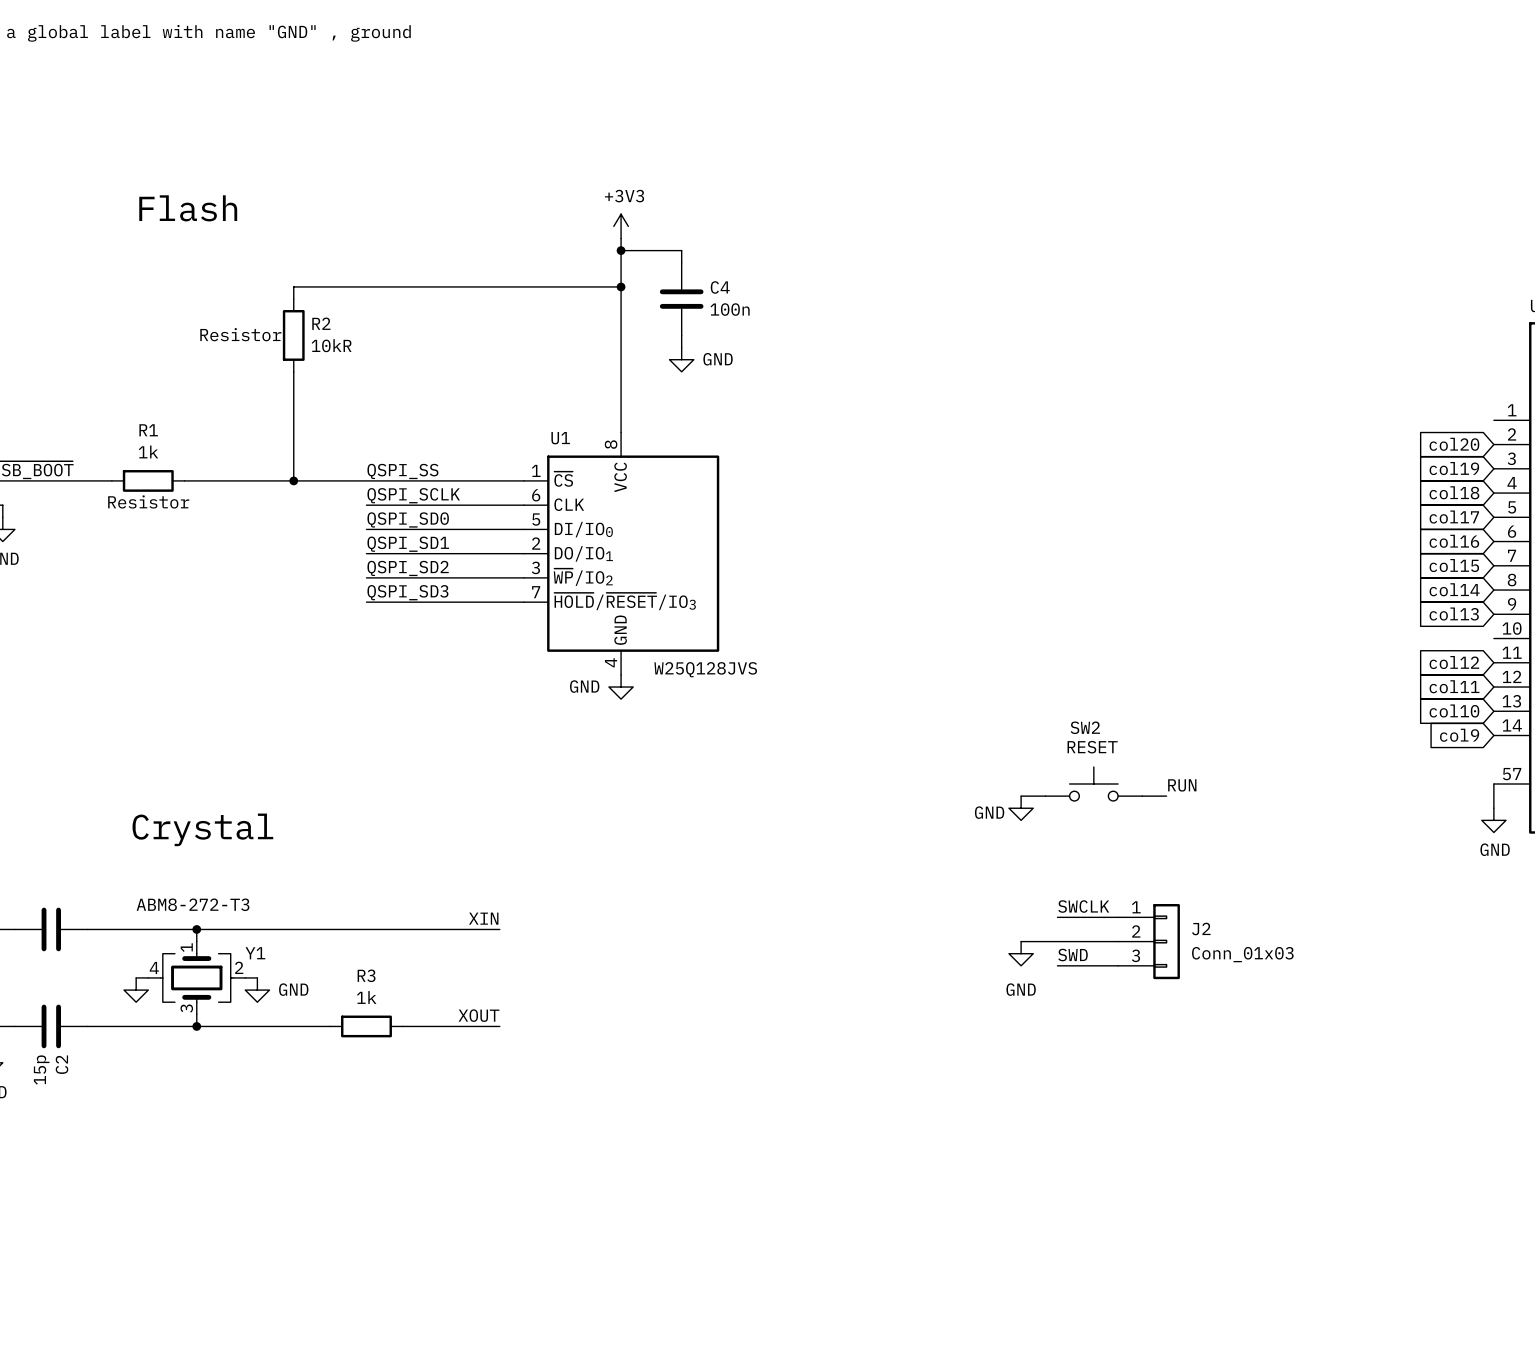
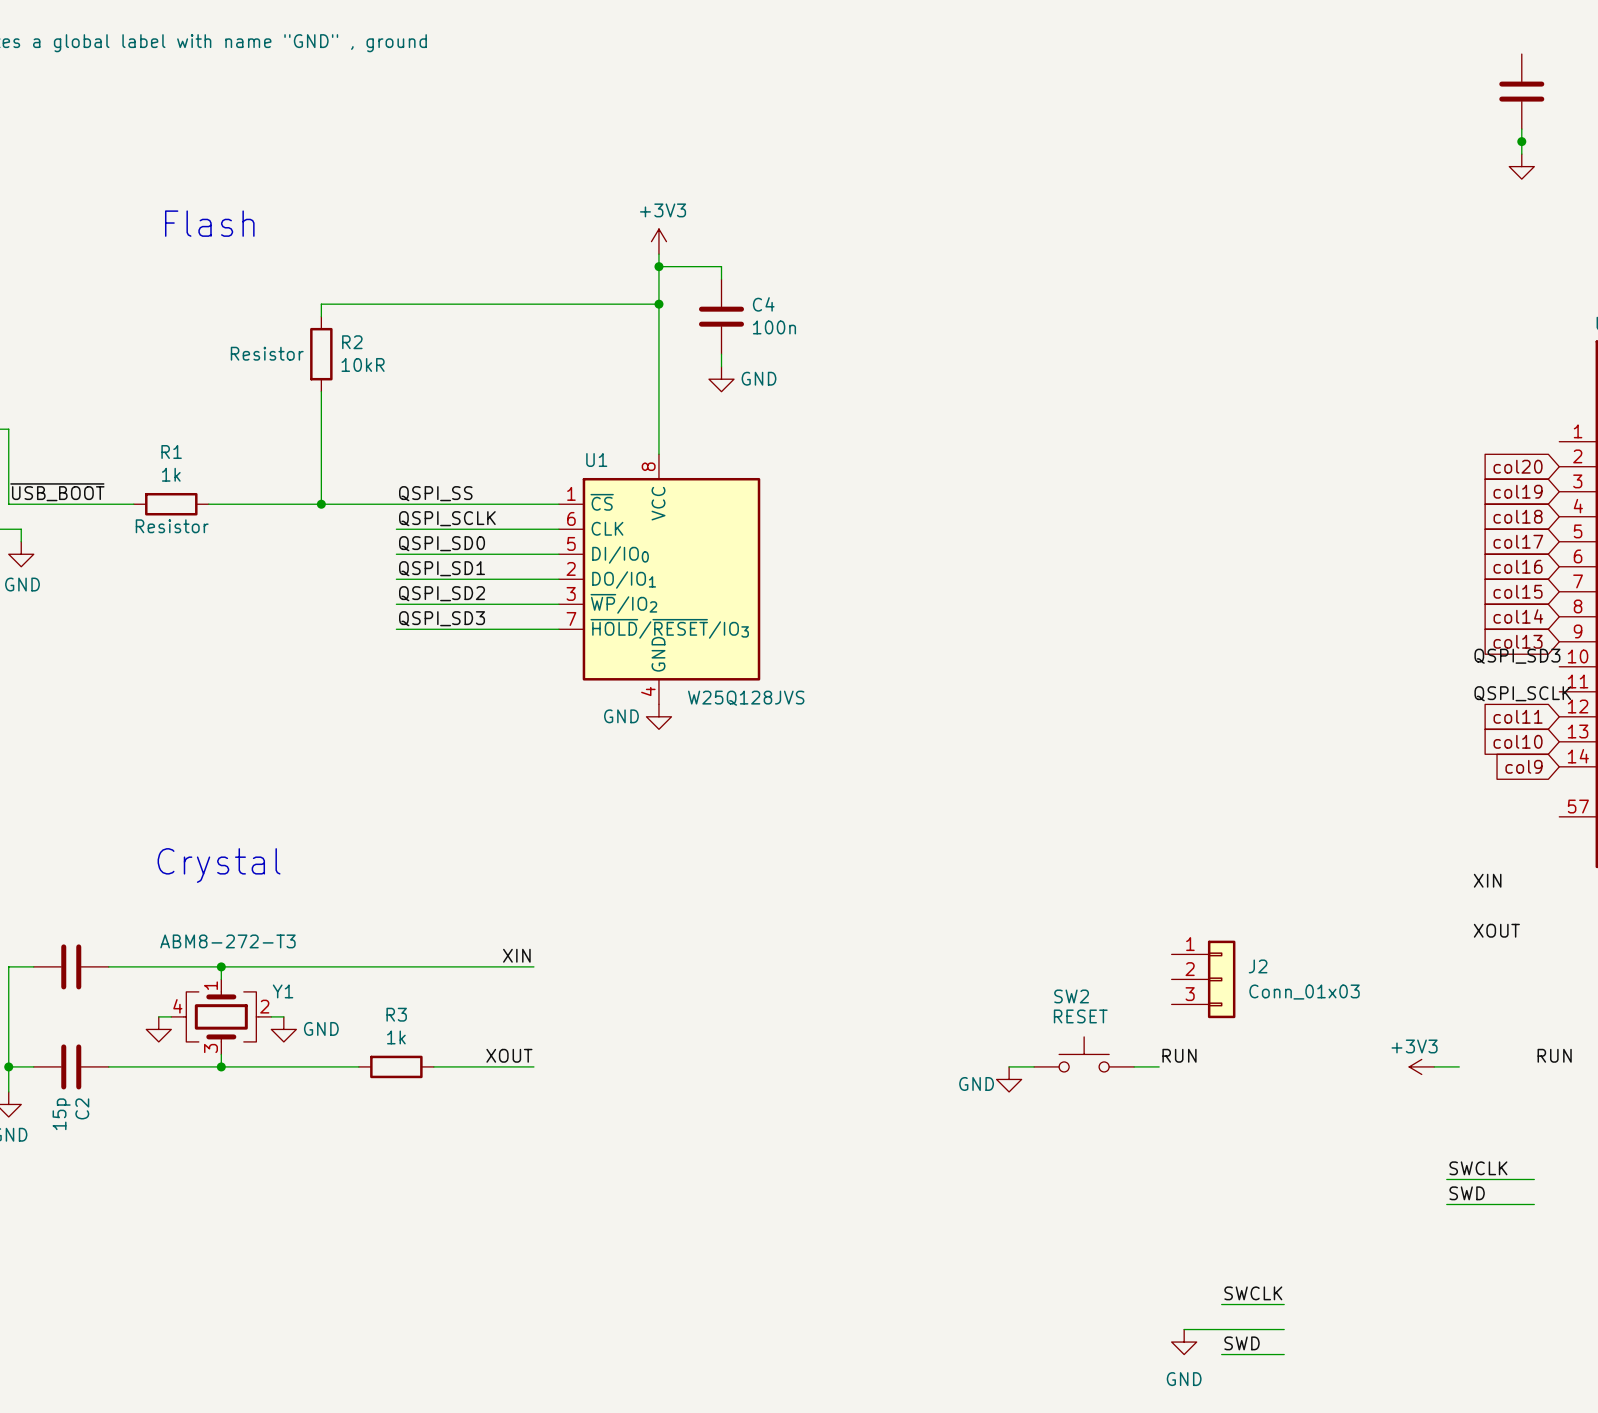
part: none -> (1521, 91)
wire: none -> (1521, 129) (1521, 154)
junction: none -> (1521, 141)
power symbol: none -> (1521, 166)
label: none -> QSPI_SD3 (1517, 656)
global label: col12 (1454, 662) -> none
label: none -> QSPI_SCLK (1522, 693)
SW2 position: (1093, 783) -> (1084, 1054)
wire: (1493, 783) (1493, 808) -> none
label: RUN (1182, 785) -> none
wire: (1021, 796) (1045, 796) -> (1009, 1066) (1034, 1066)
wire: (1142, 796) (1166, 796) -> (1134, 1066) (1159, 1066)
power symbol: GND (1021, 808) -> none
power symbol: GND (1493, 820) -> none
label: none -> XIN (1487, 880)
label: none -> XOUT (1496, 930)
label: SWCLK (1083, 906) -> none
wire: (1057, 917) (1118, 917) -> none
wire: (1021, 941) (1118, 941) -> none
power symbol position: GND (1021, 953) -> GND (1009, 1079)
label: SWD (1073, 955) -> none
wire: (1057, 965) (1118, 965) -> none
power symbol text position: GND (1021, 989) -> GND (976, 1083)
label: none -> RUN (1179, 1055)
label: none -> RUN (1554, 1055)
power symbol: none -> +3V3 (1421, 1066)
wire: none -> (1434, 1066) (1459, 1066)
label: none -> SWCLK (1478, 1168)
wire: none -> (1446, 1179) (1534, 1179)
label: none -> SWD (1467, 1193)
wire: none -> (1446, 1204) (1534, 1204)
label: none -> SWCLK (1253, 1293)
wire: none -> (1221, 1304) (1284, 1304)
wire: none -> (1184, 1329) (1284, 1329)
power symbol: none -> GND (1184, 1342)
label: none -> SWD (1242, 1343)
wire: none -> (1221, 1354) (1284, 1354)

